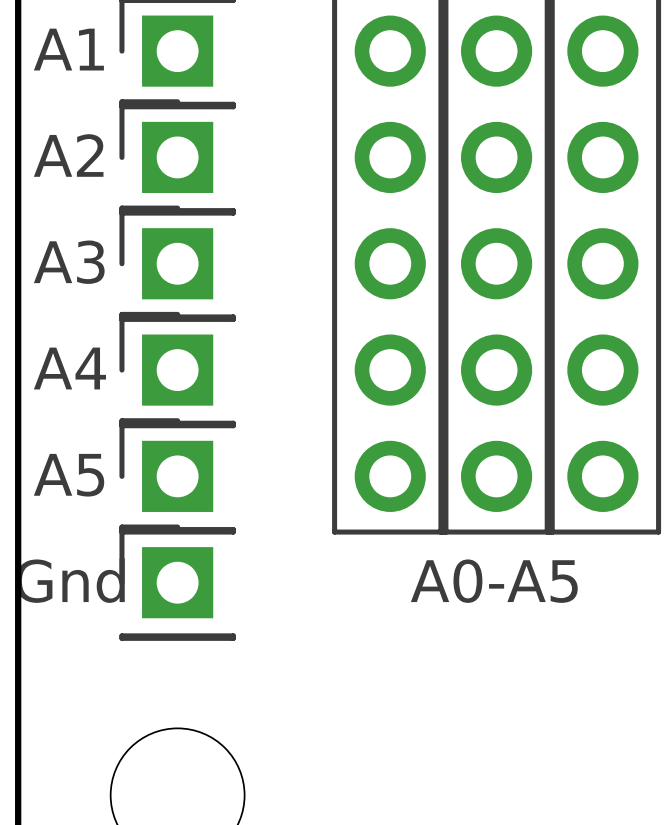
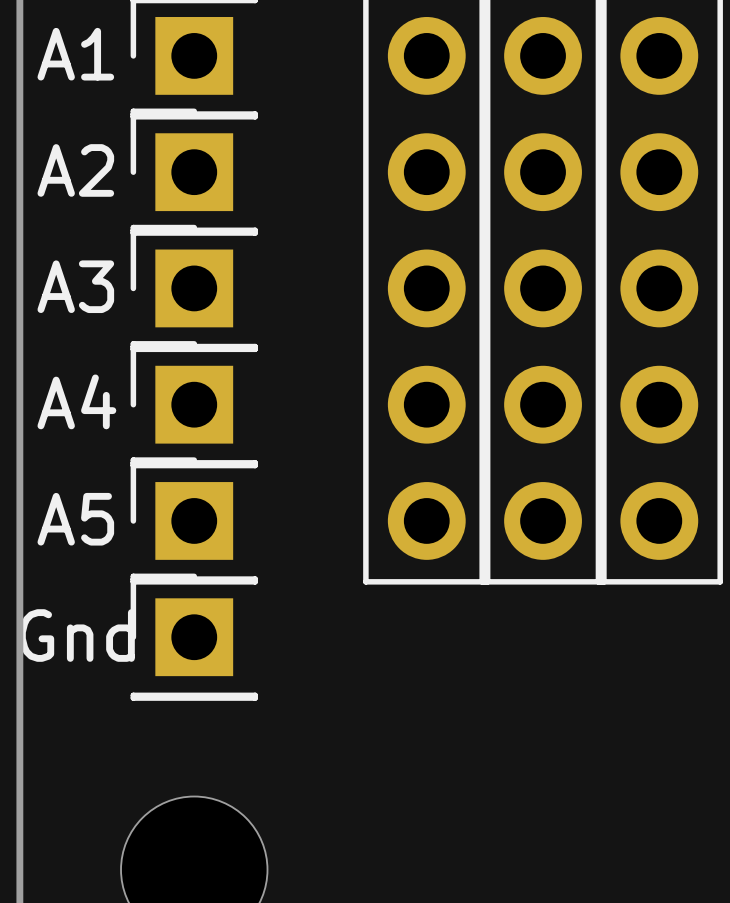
text: A0-A5 (494, 581) -> none

